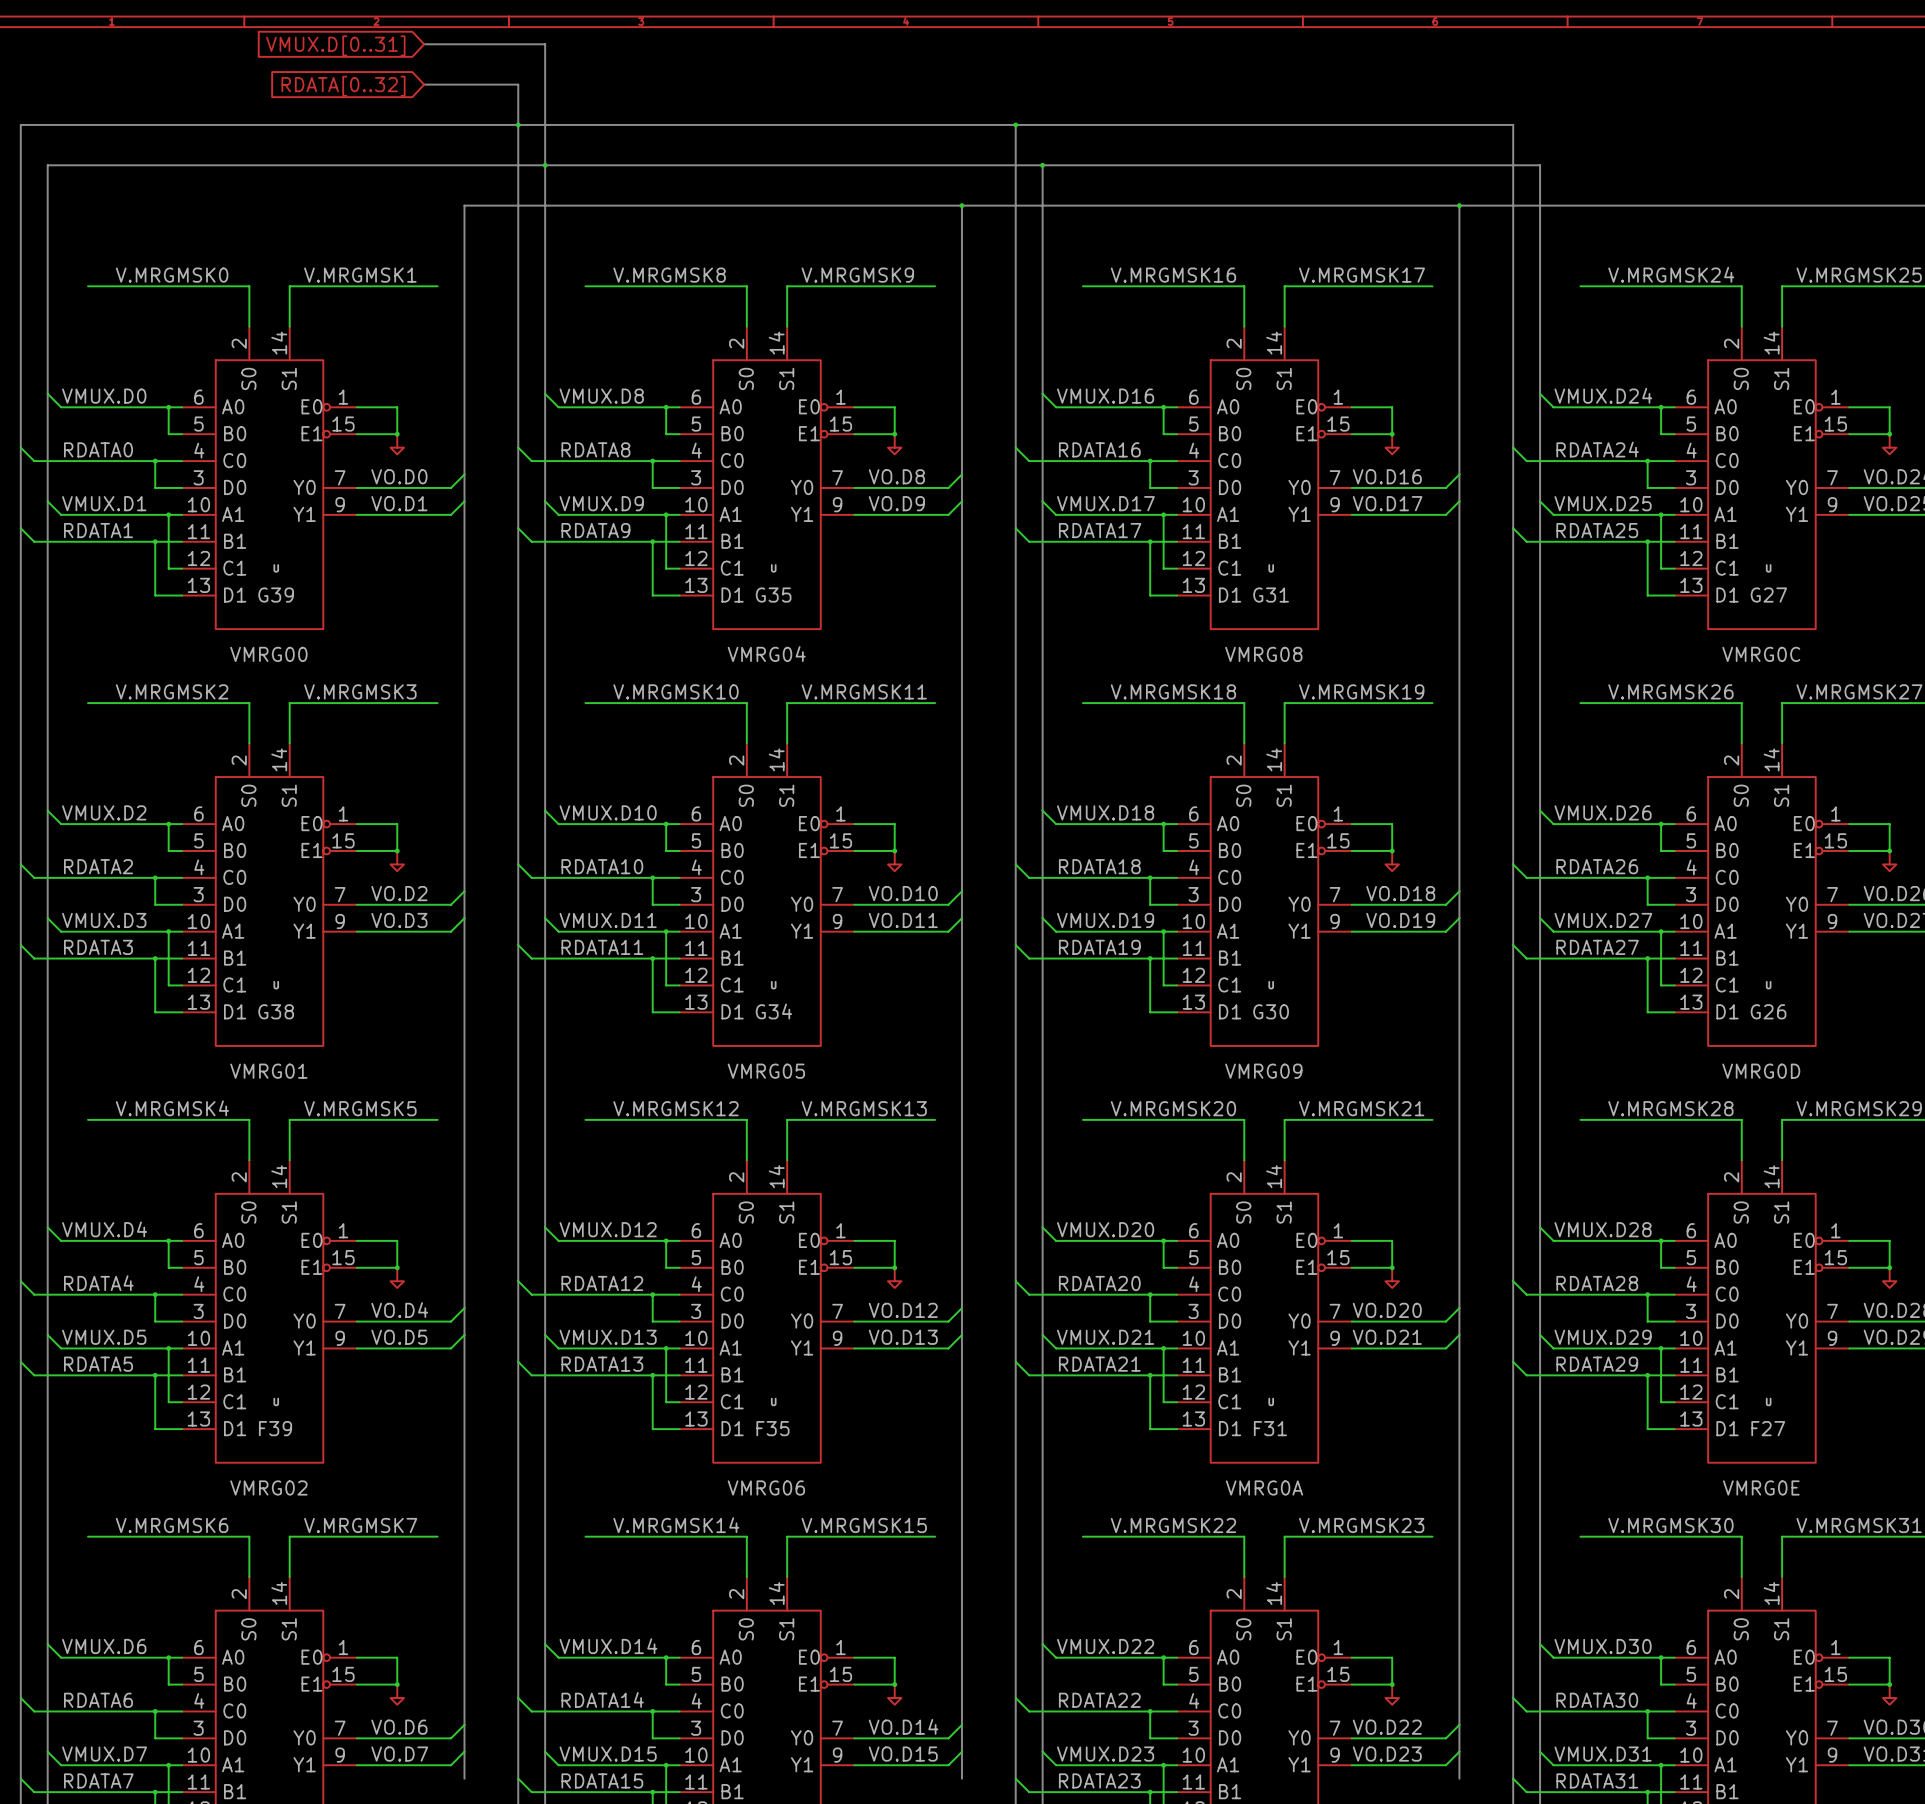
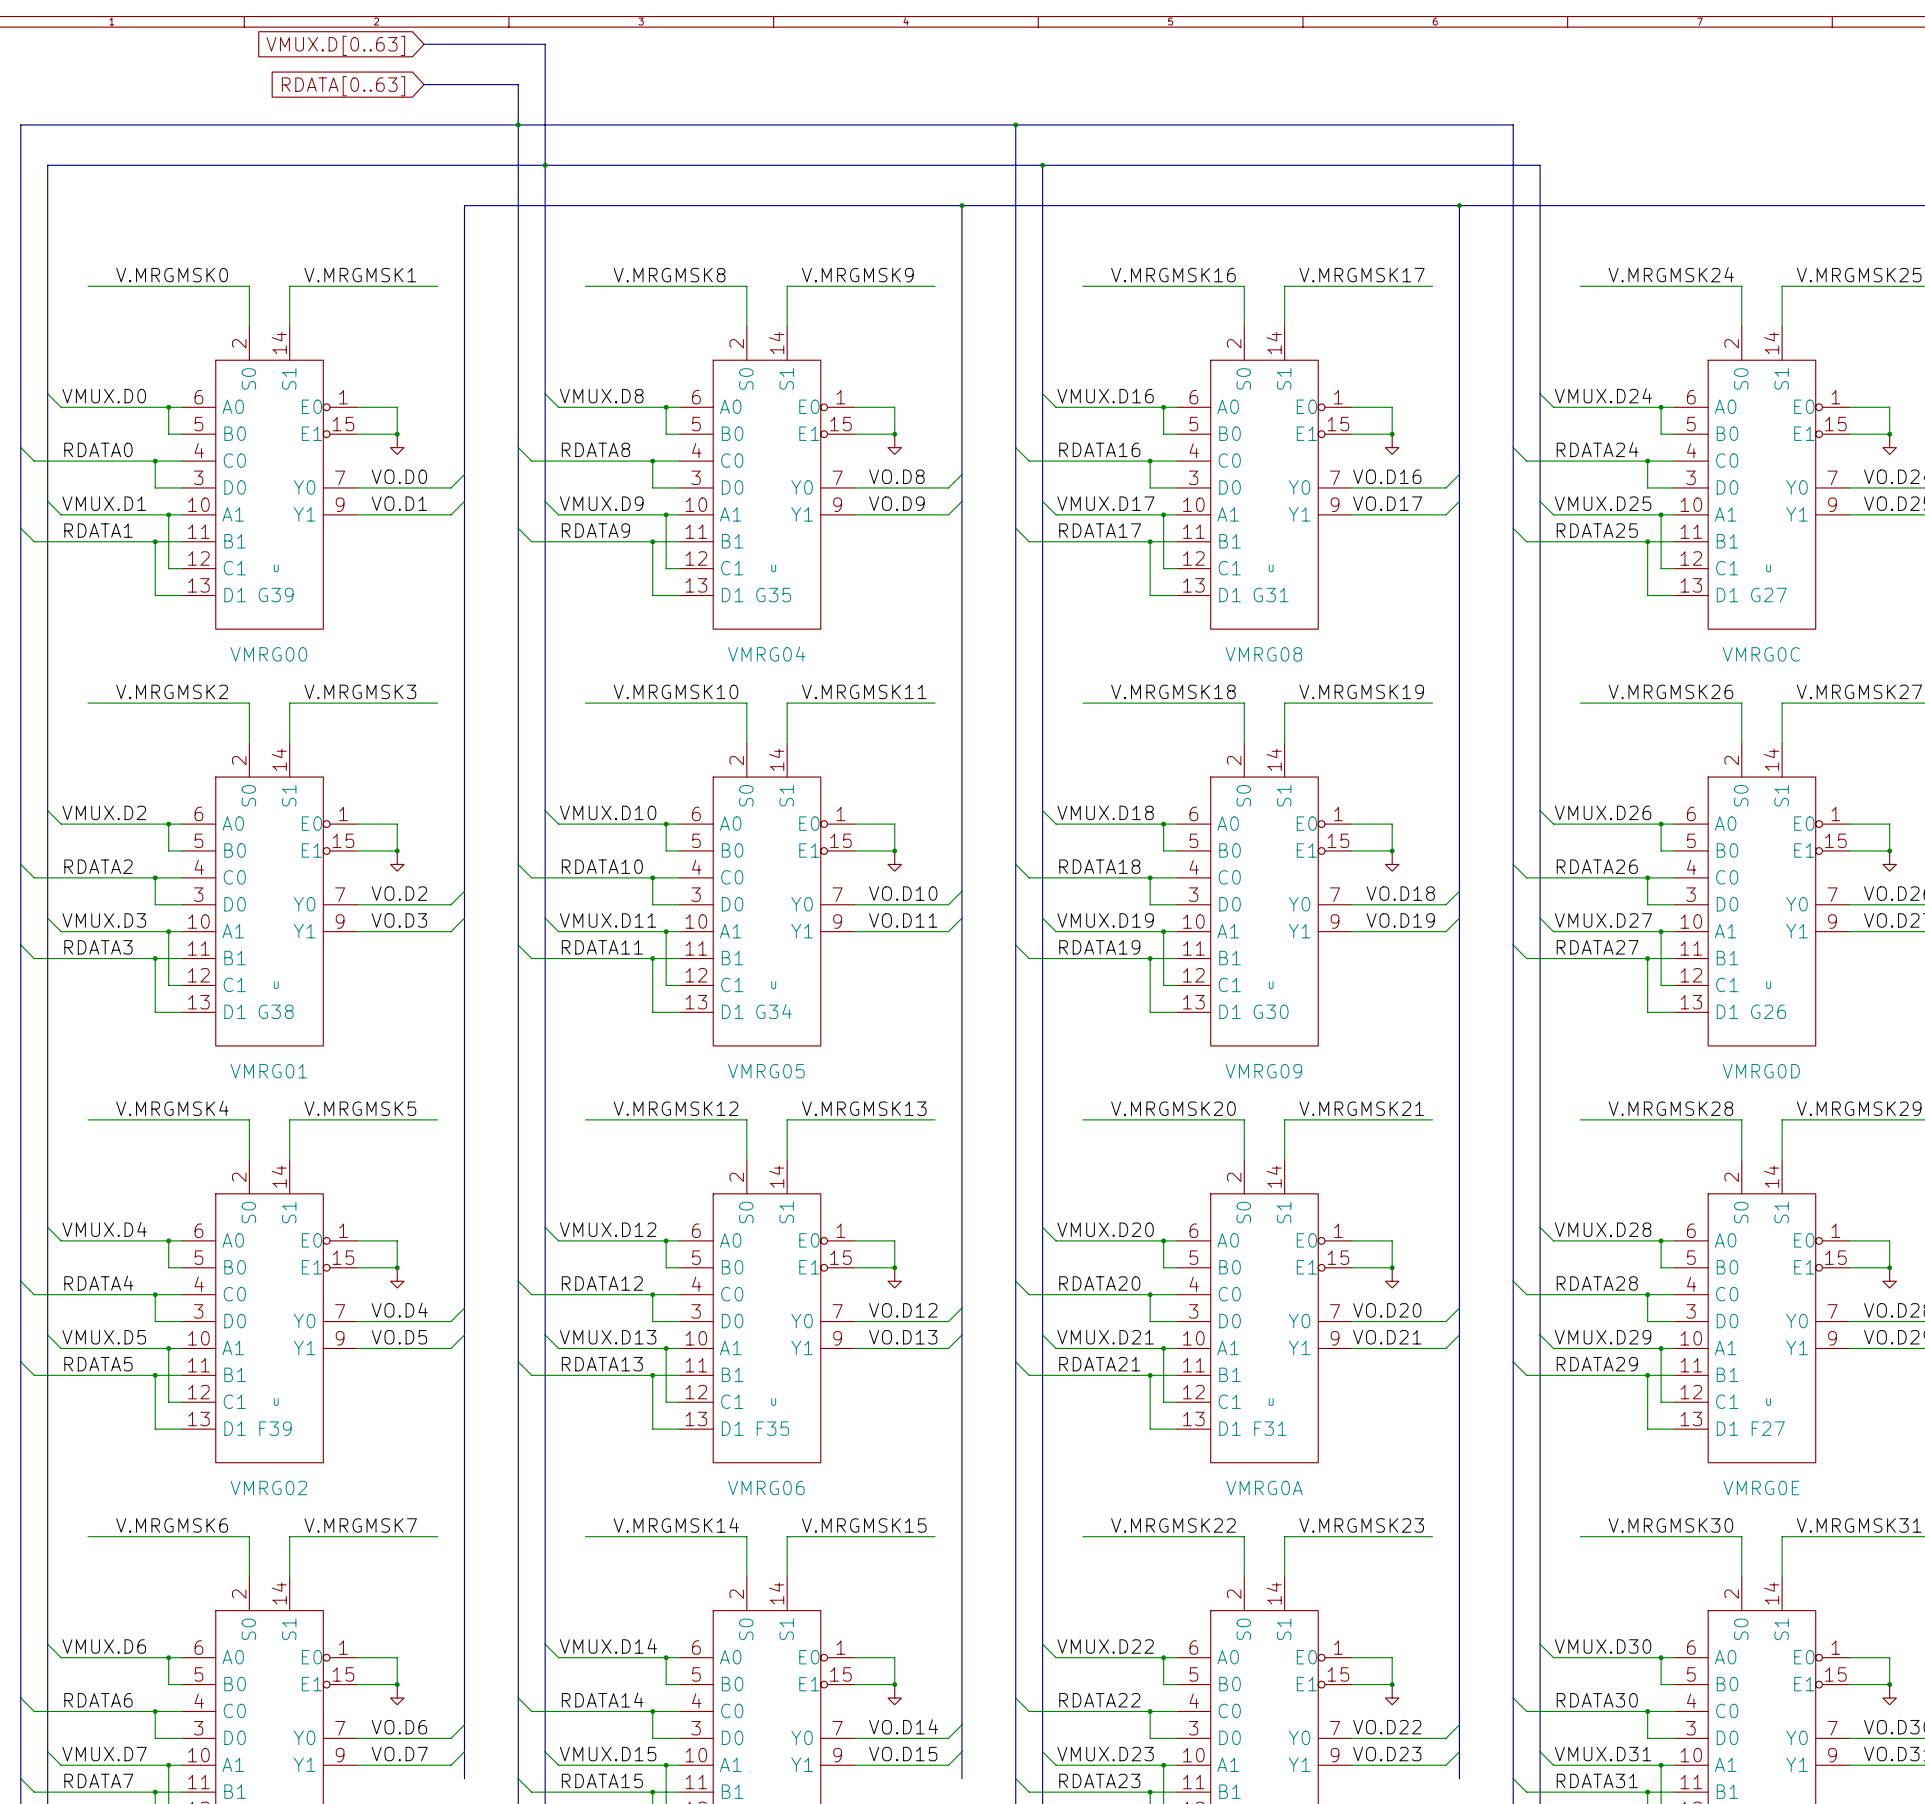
global label: VMUX.D[0..31] (335, 45) -> VMUX.D[0..63] (335, 45)
global label: RDATA[0..32] (343, 86) -> RDATA[0..63] (343, 86)

